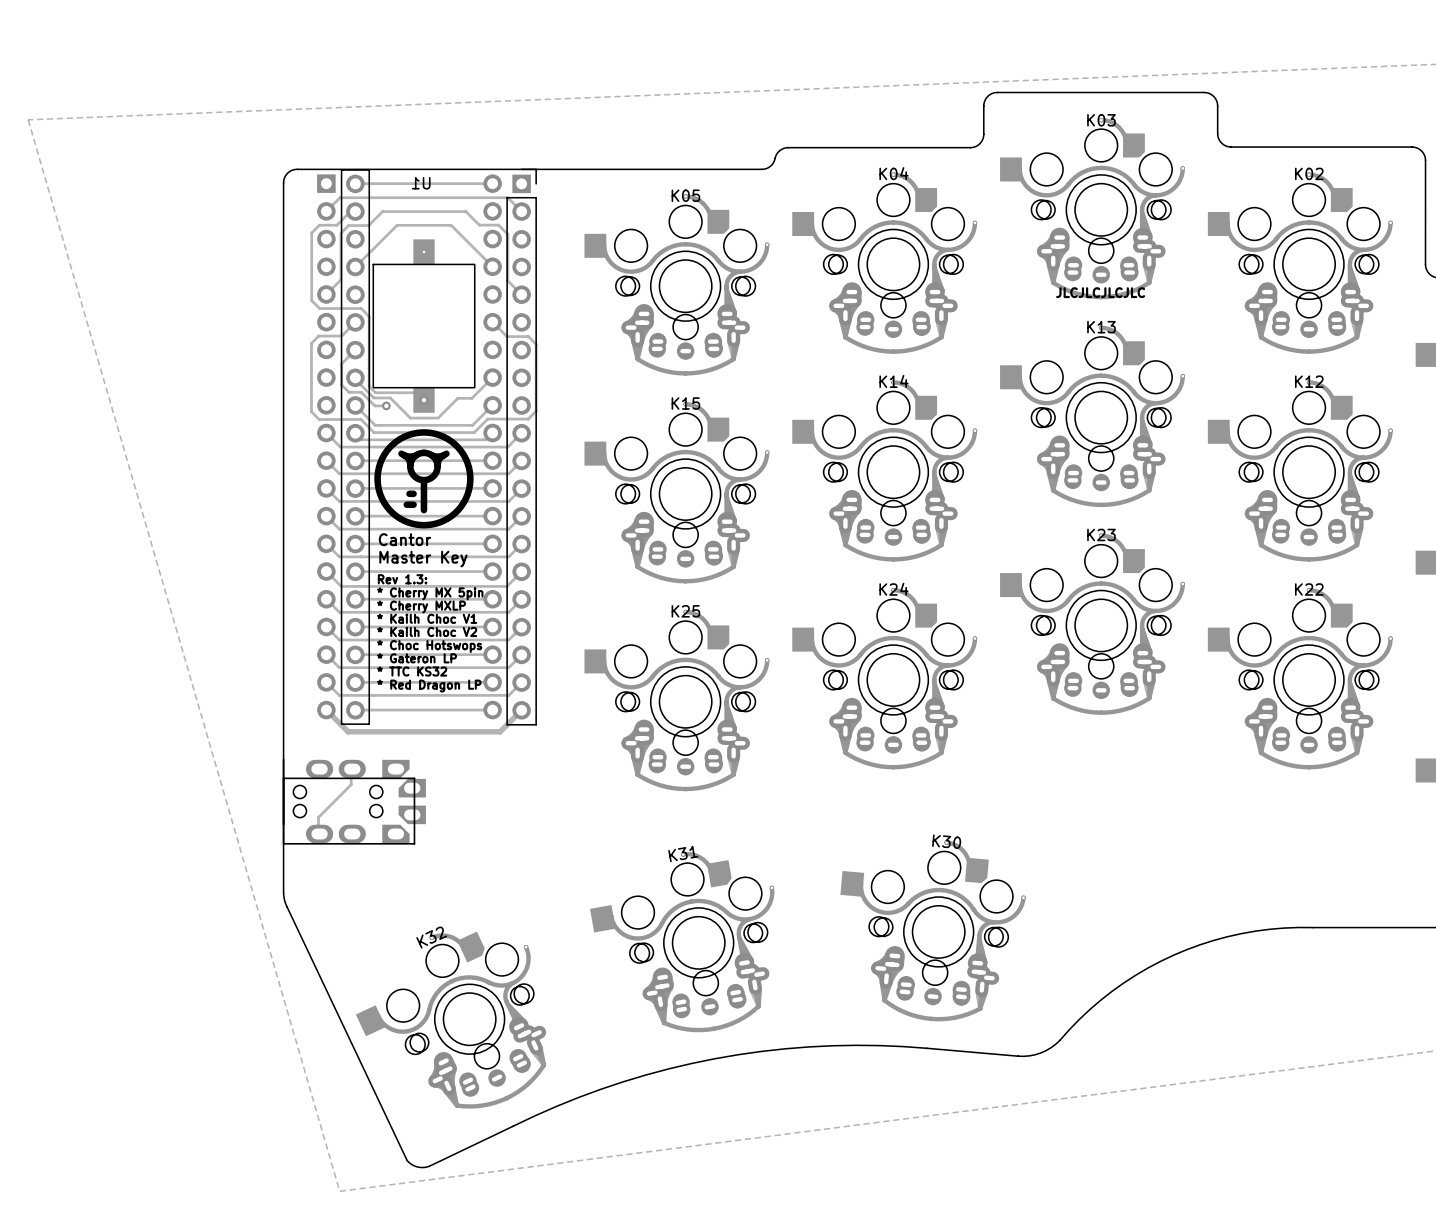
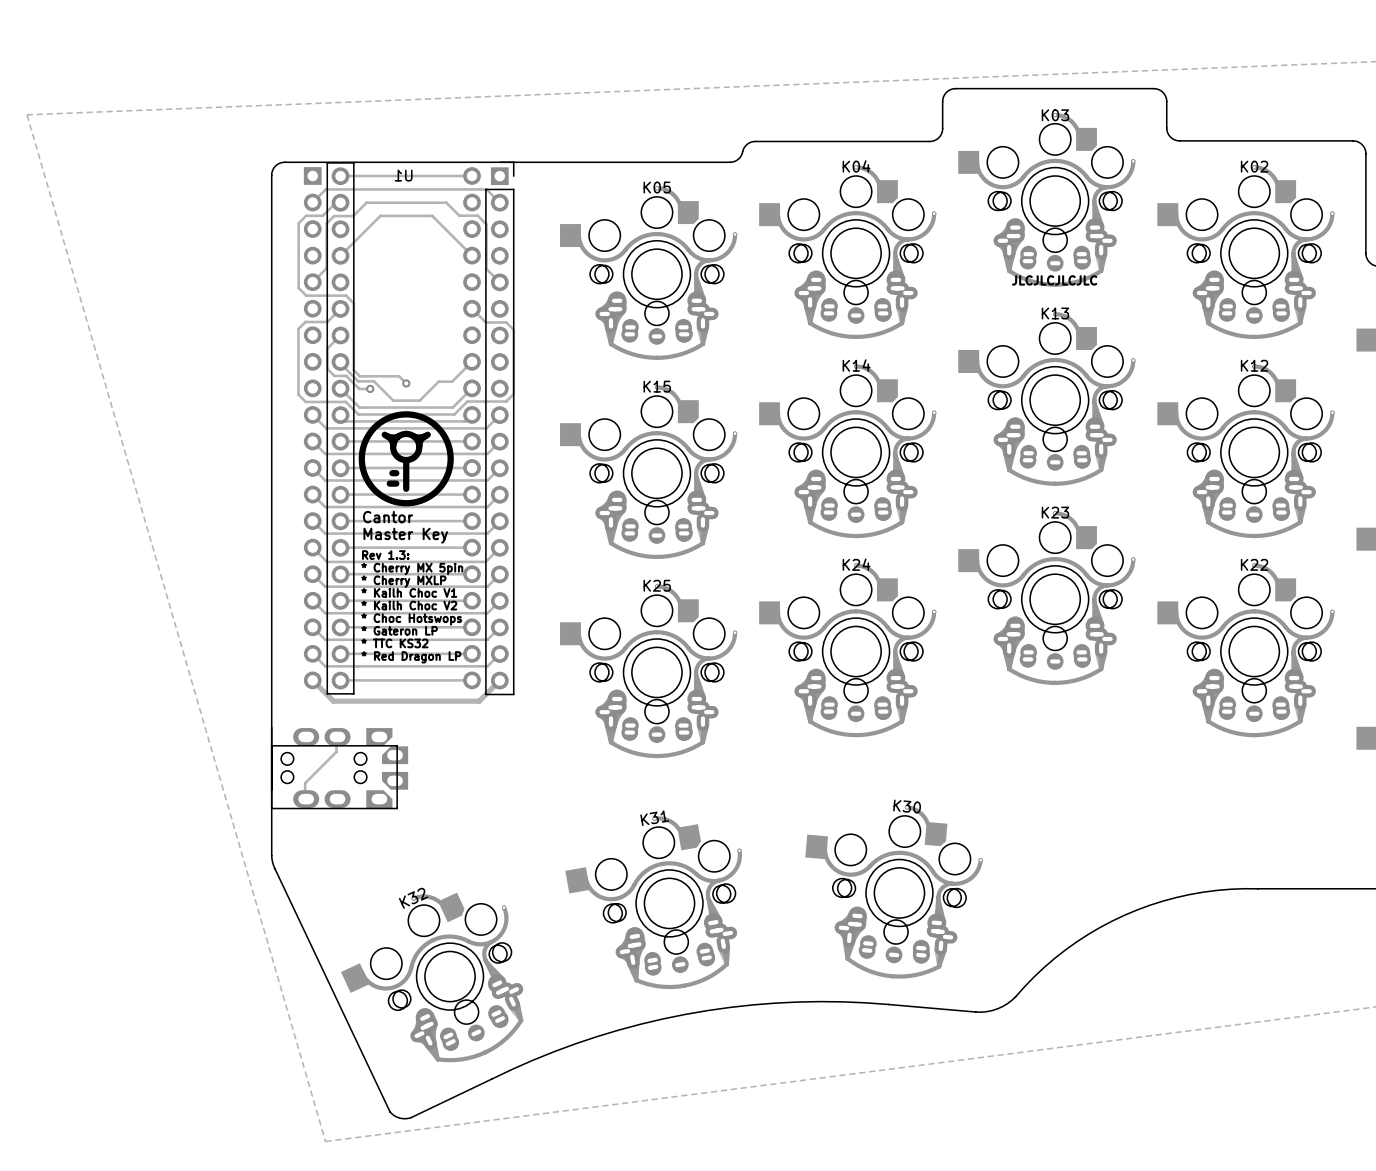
part: (424, 326) -> none

